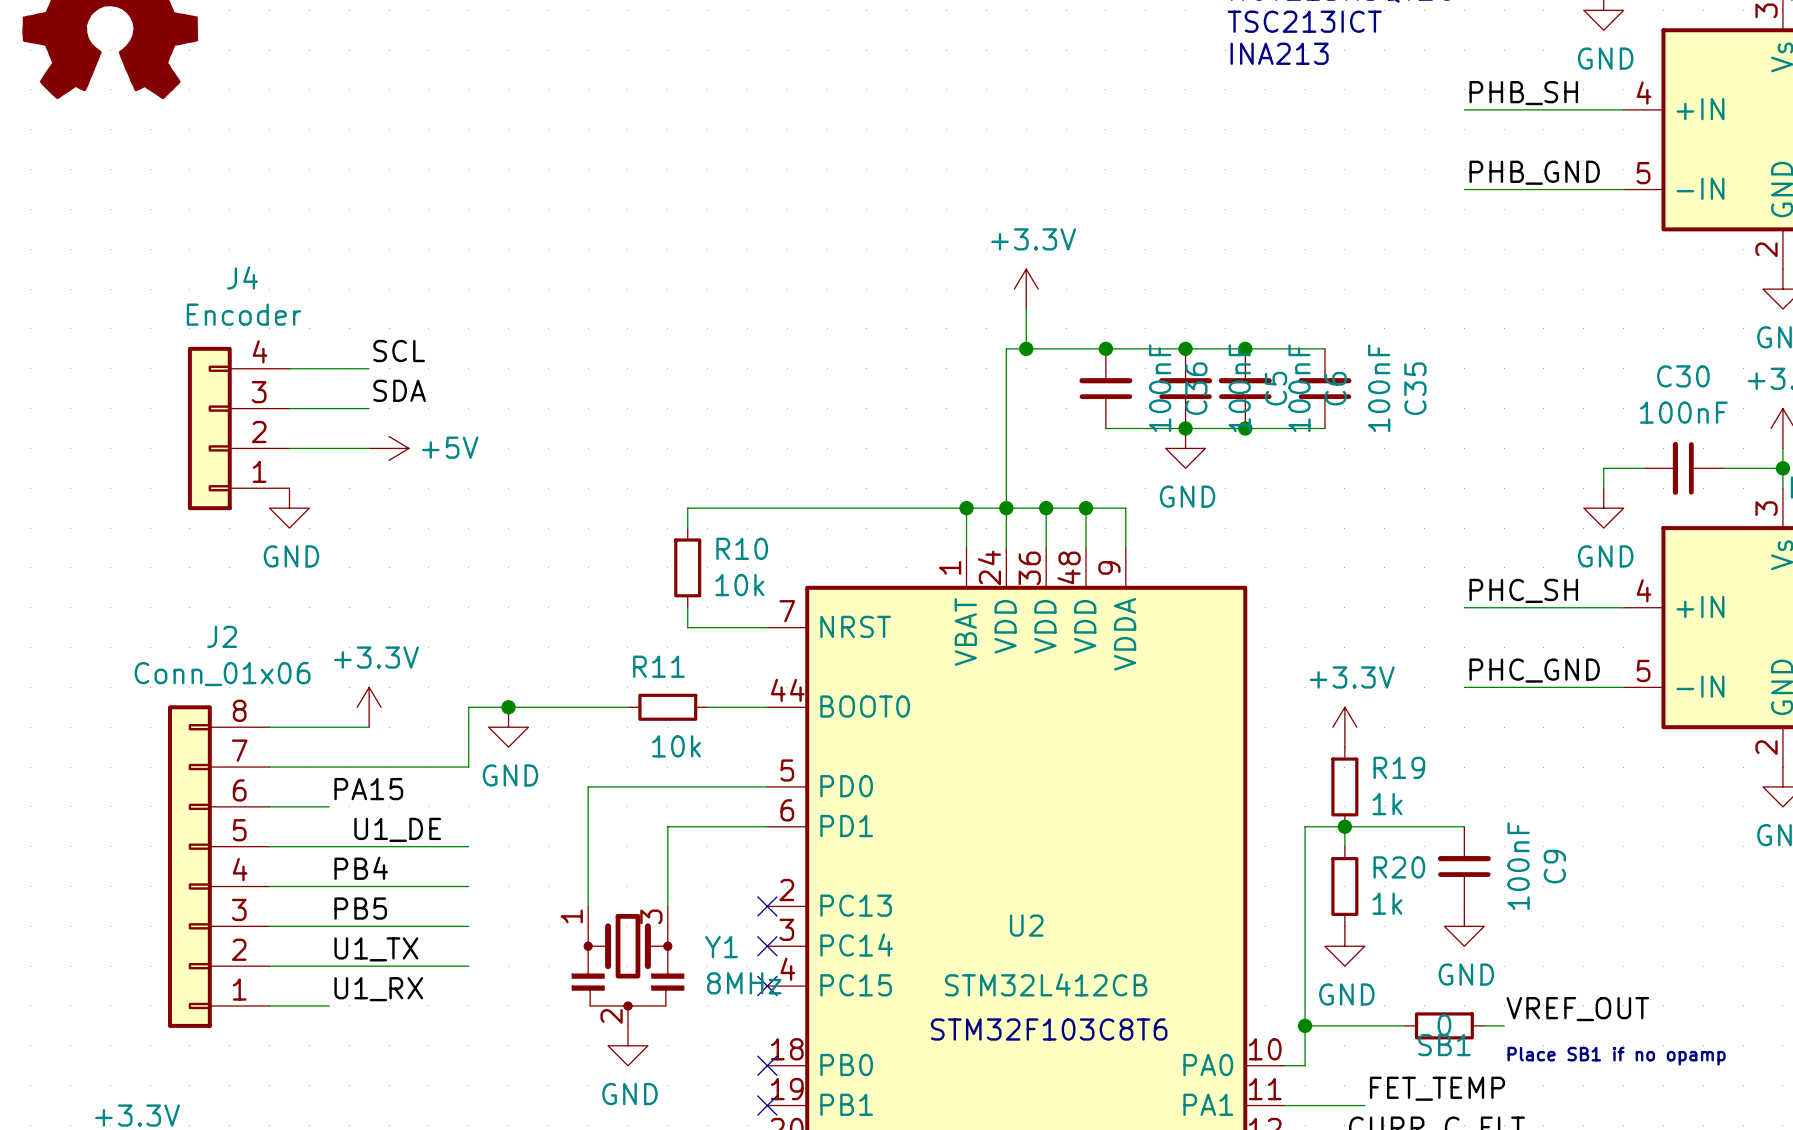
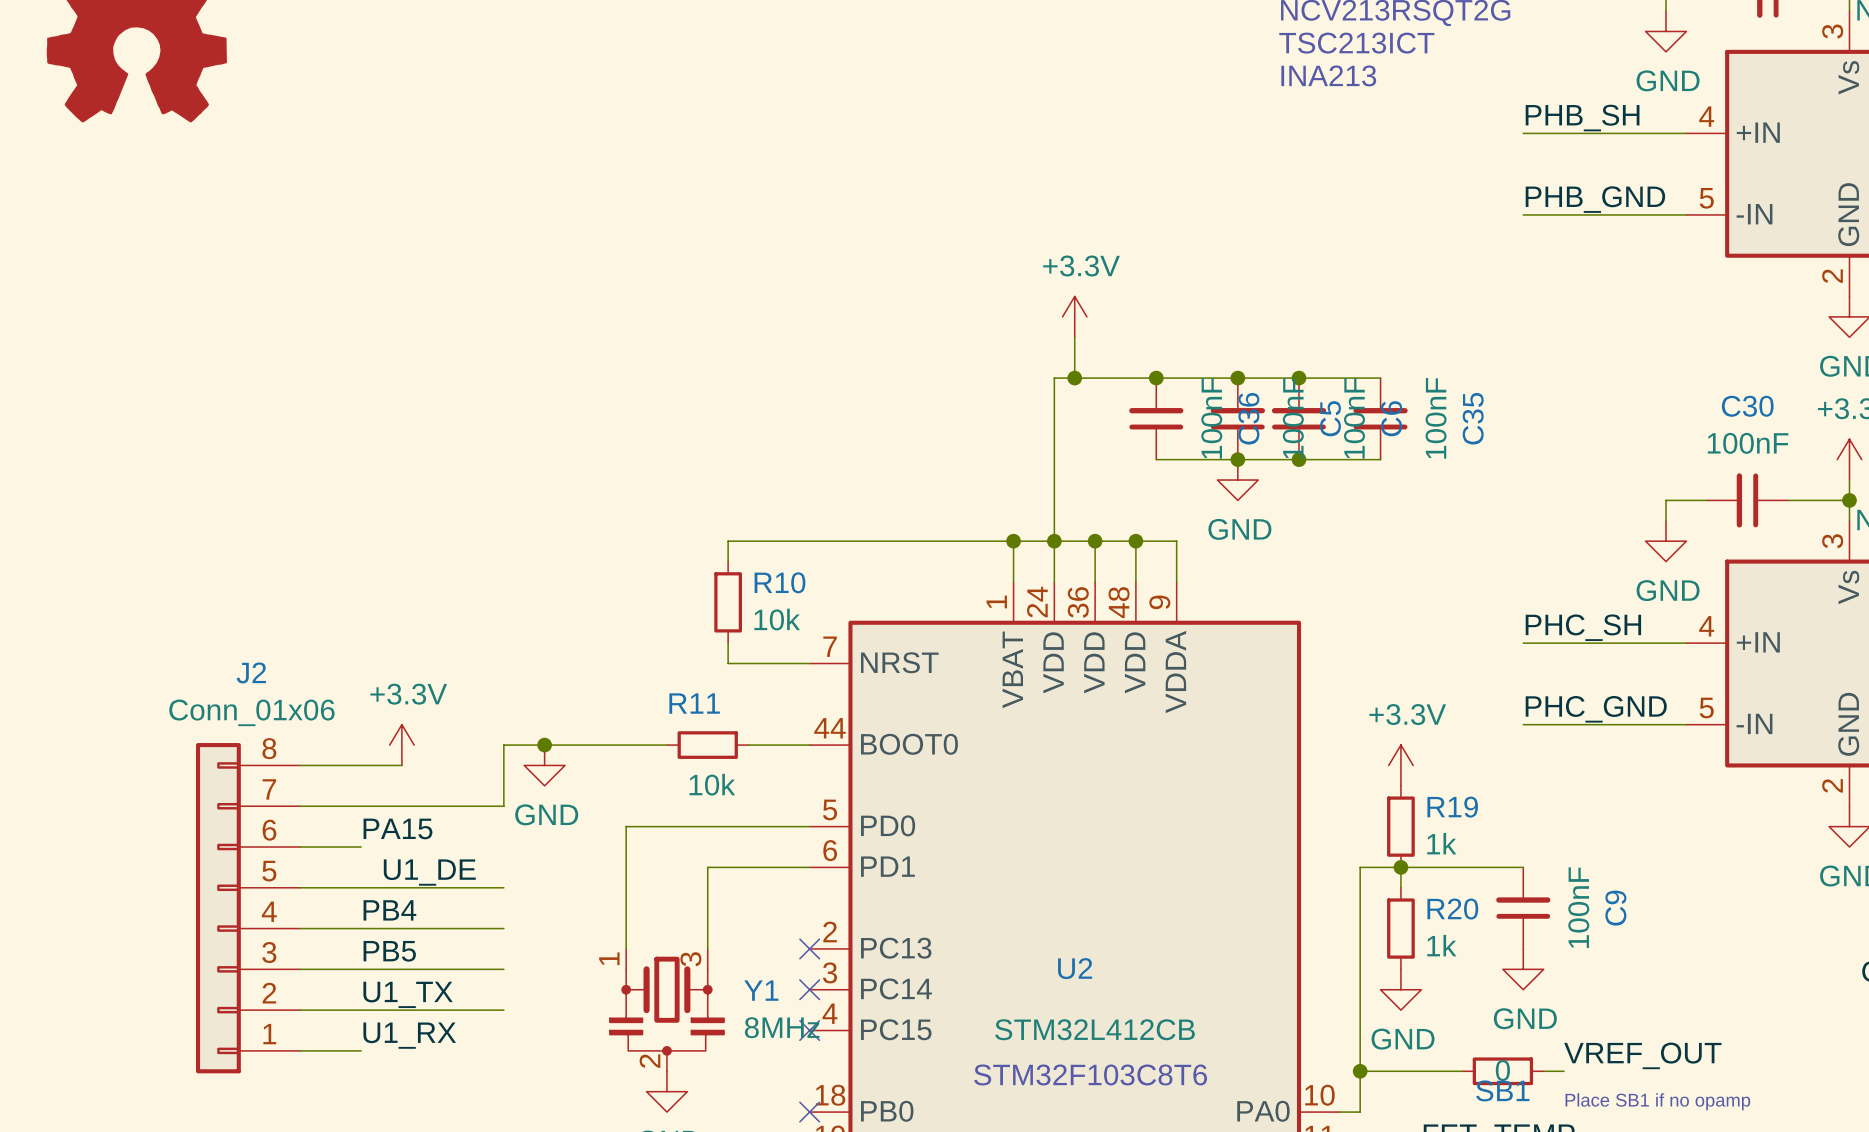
label: SCL (399, 351) -> none
wire: (289, 368) (369, 368) -> none
label: SDA (399, 390) -> none
wire: (289, 408) (369, 408) -> none
J4: Encoder (238, 428) -> none
wire: (289, 448) (369, 448) -> none
power symbol: +5V (389, 448) -> none
power symbol: GND (289, 508) -> none

